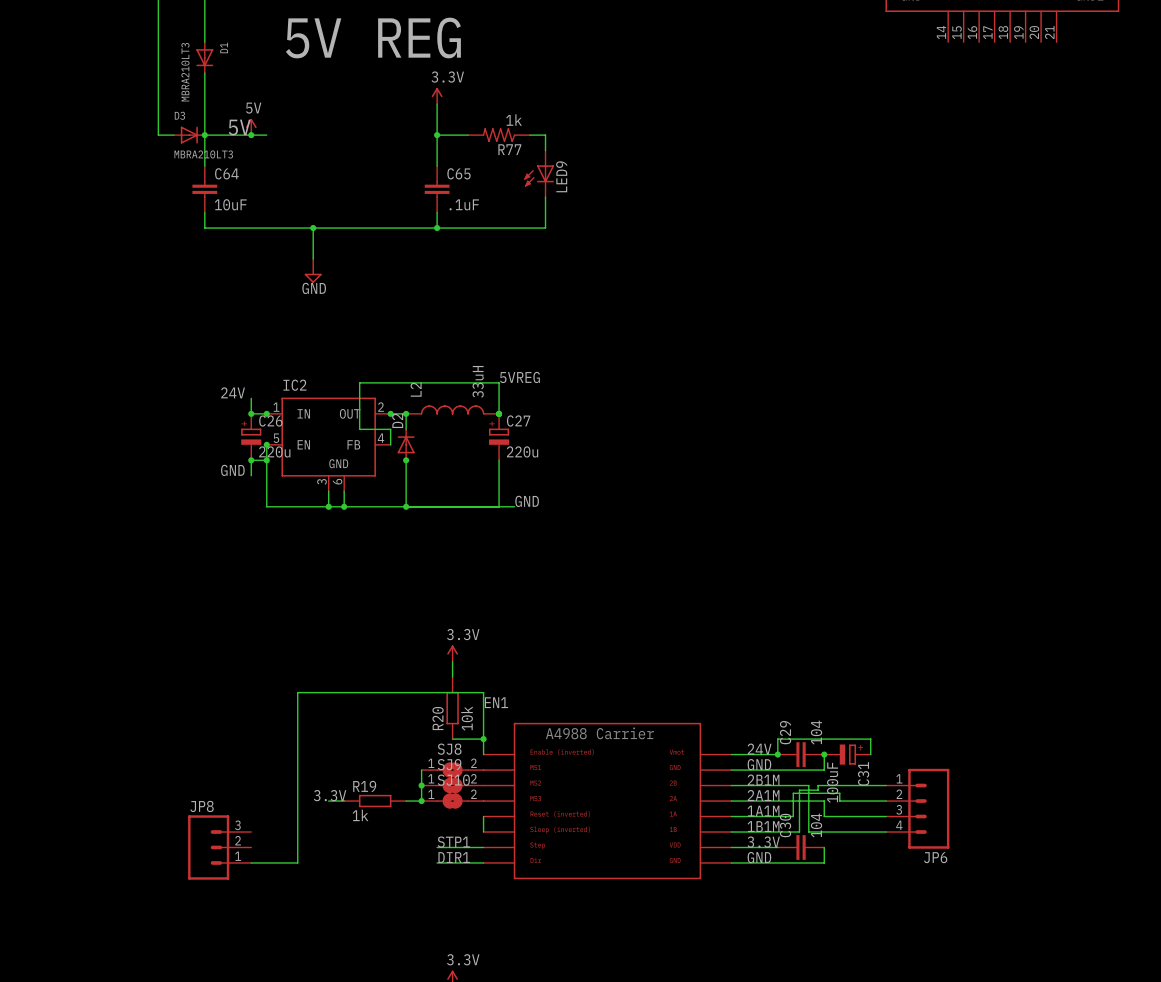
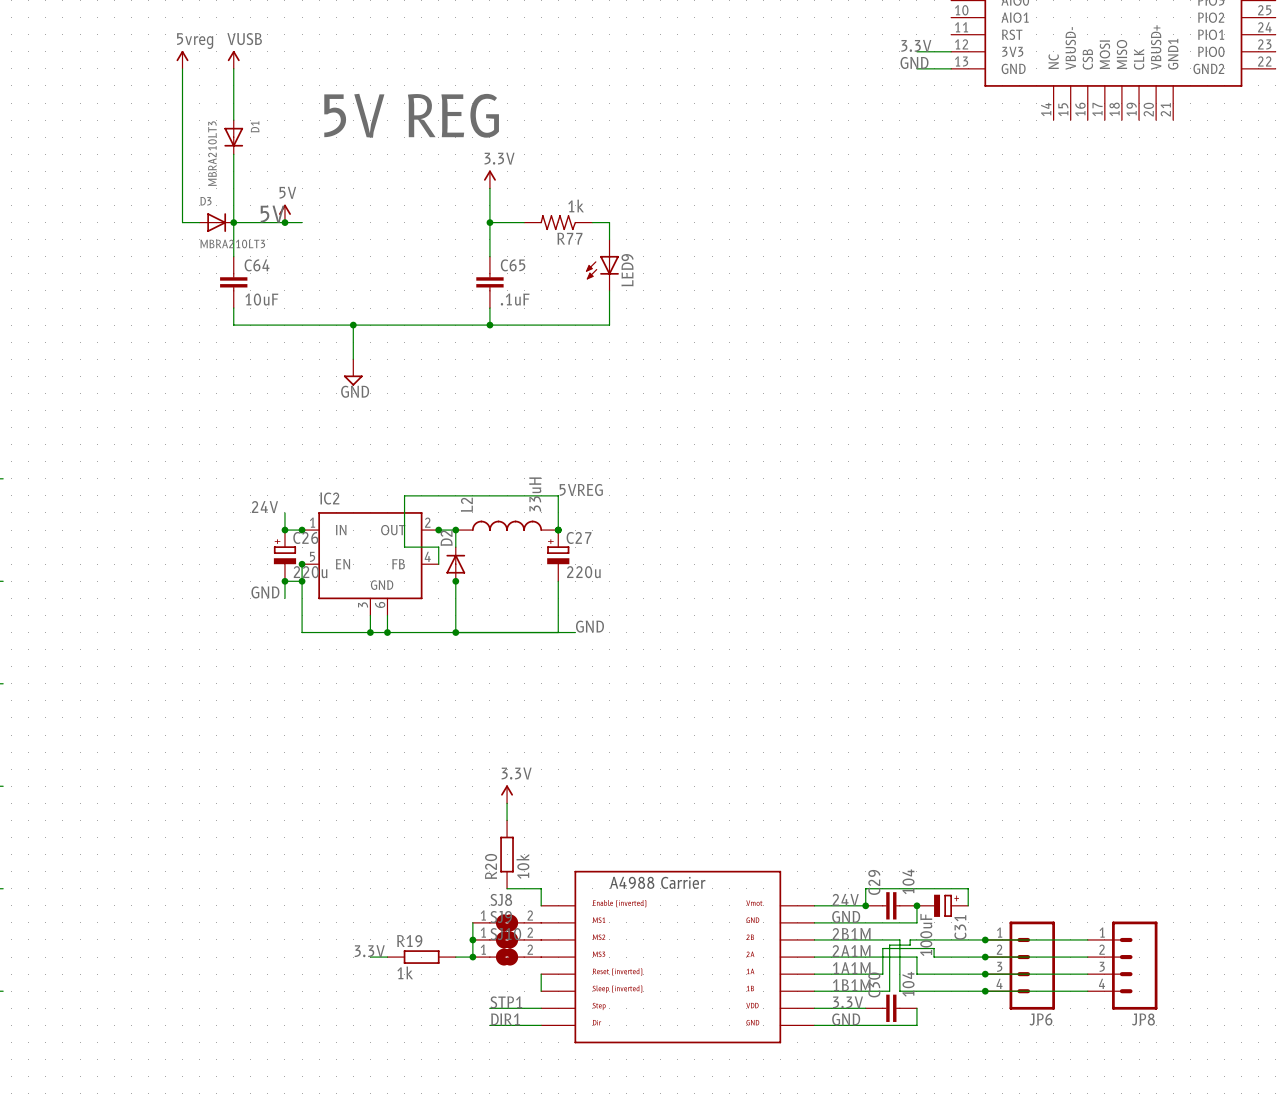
label: EN1 (496, 702) -> none
wire: (483, 739) (483, 692) (297, 692) (297, 862) (251, 862) -> none
junction: (483, 739) -> none
wire: none -> (985, 939) (1087, 939)
junction: none -> (985, 939)
wire: none -> (985, 957) (1087, 957)
junction: none -> (985, 957)
JP8 name position: JP8 (202, 806) -> JP8 (1143, 1019)
JP8 symbol: [188, 815, 252, 880] -> [1087, 921, 1158, 1010]
wire: none -> (985, 974) (1087, 974)
junction: none -> (985, 974)
wire: none -> (985, 991) (1087, 991)
junction: none -> (985, 991)

